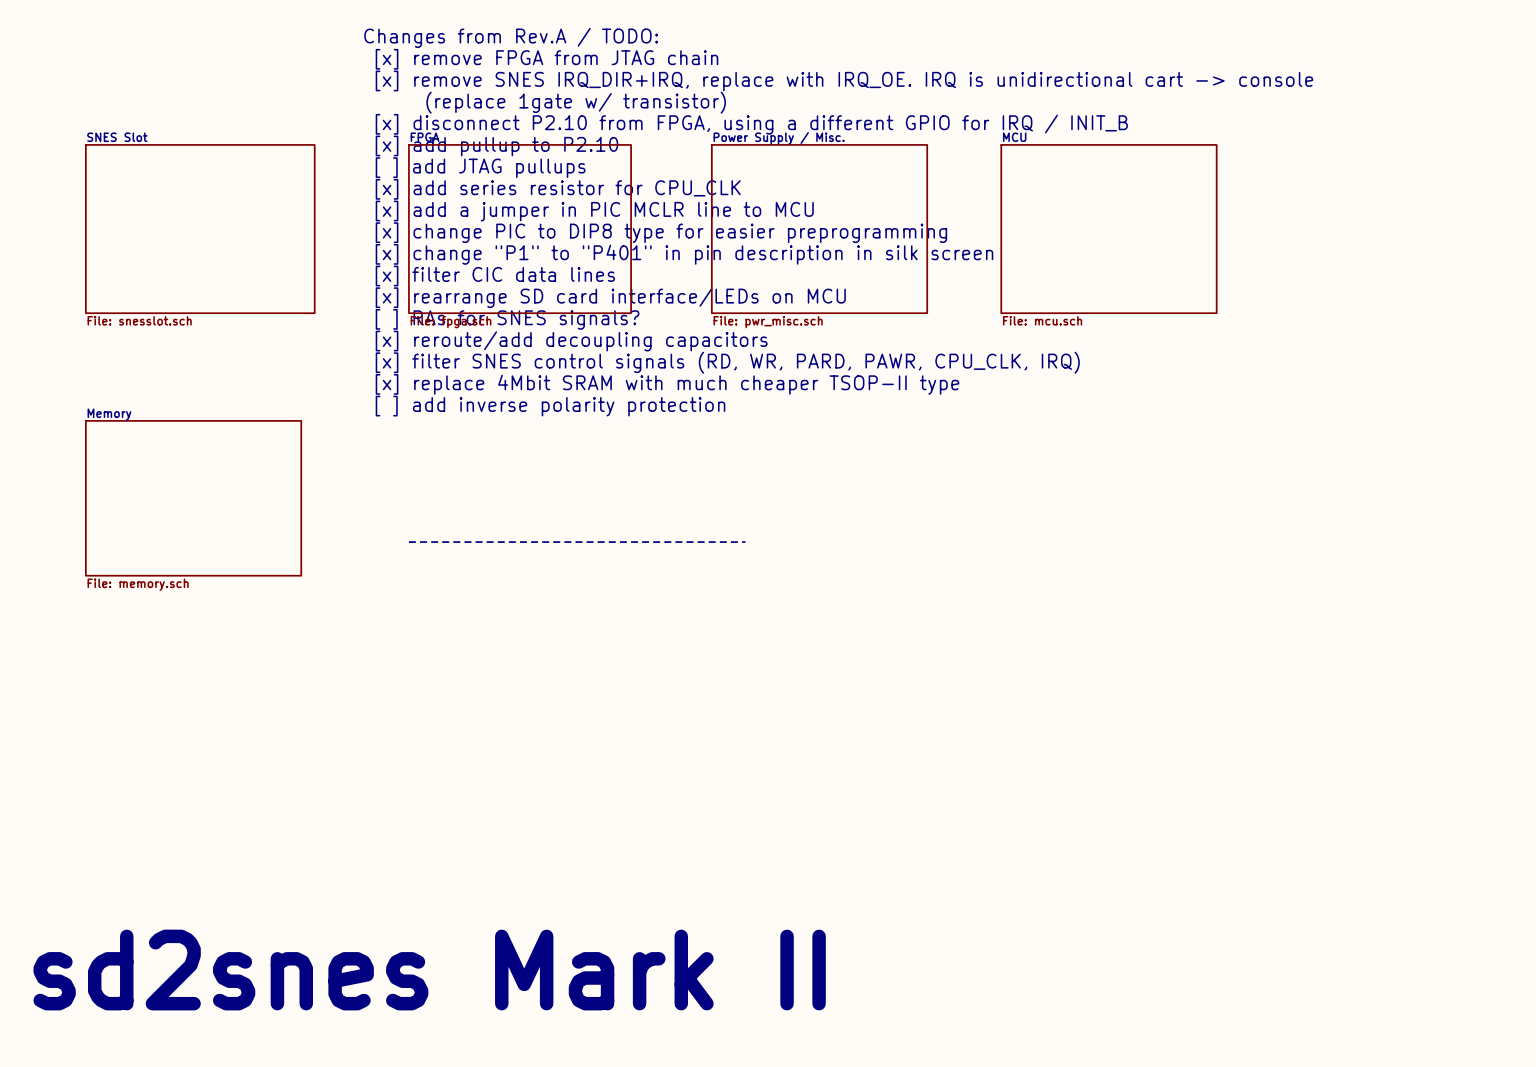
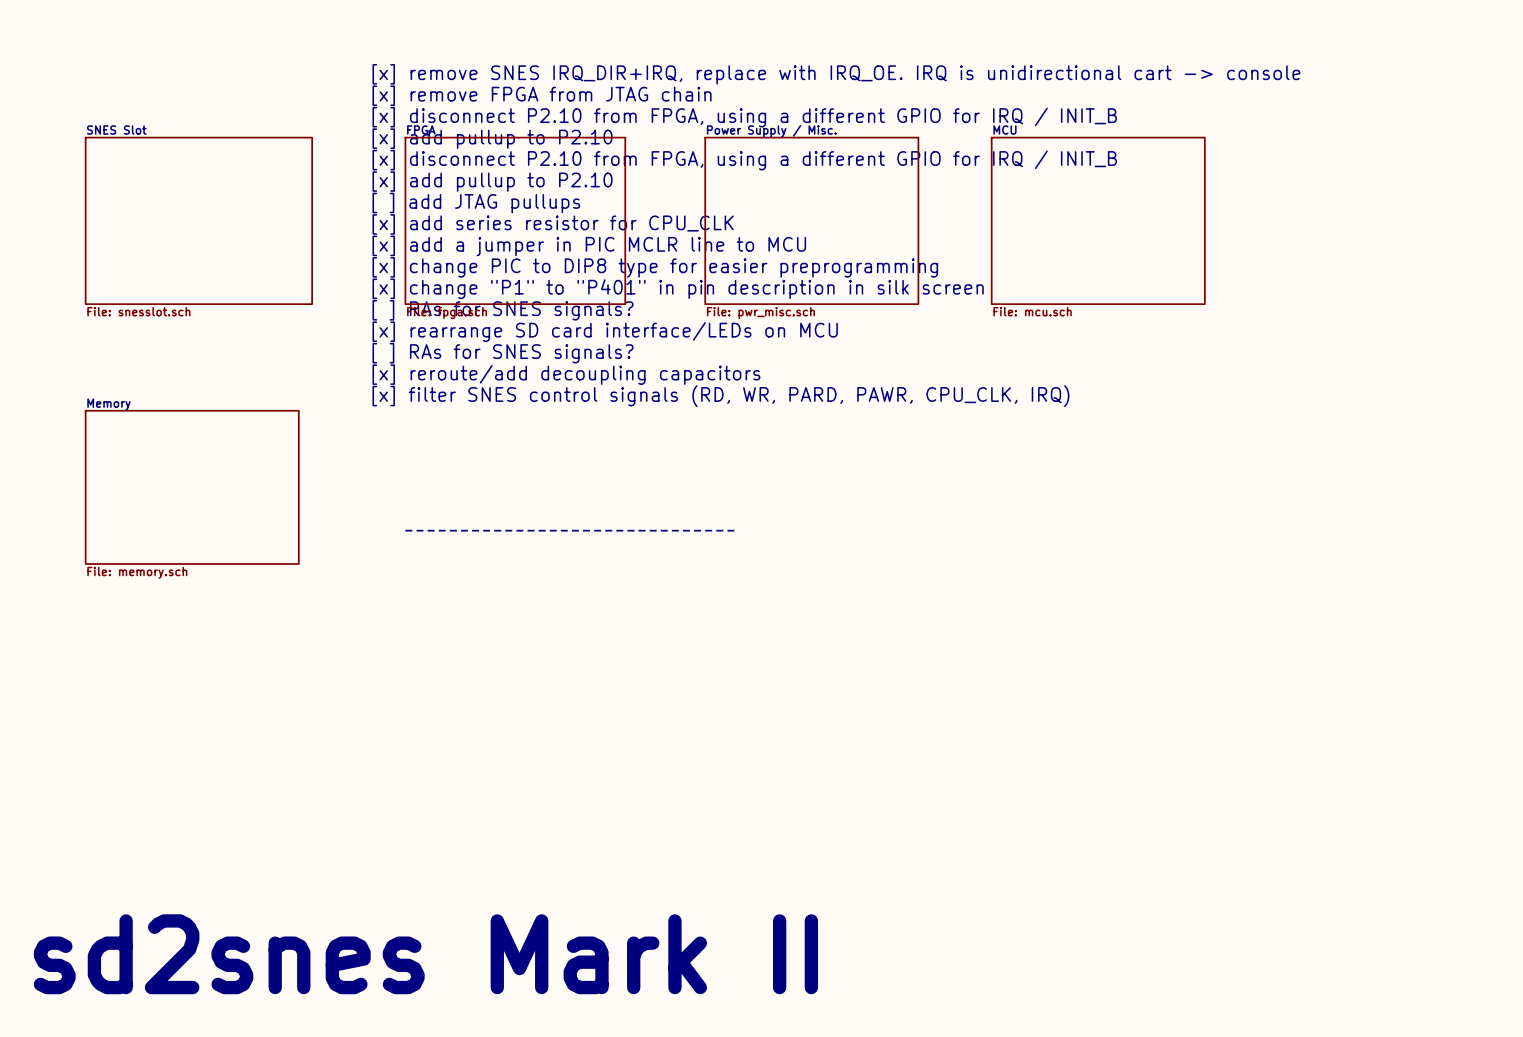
text: Changes from Rev.A / TODO: (511, 37) -> none
text: [x] remove FPGA from JTAG chain (546, 59) -> none
text: (replace 1gate w/ transistor) (576, 102) -> [x] remove FPGA from JTAG chain (542, 95)
text: [ ] add JTAG pullups (480, 167) -> [x] disconnect P2.10 from FPGA, using a different GPIO for IRQ / INIT_B (744, 160)
text: [x] add series resistor for CPU_CLK (558, 189) -> [x] add pullup to P2.10 (492, 181)
text: [x] add a jumper in PIC MCLR line to MCU (594, 211) -> [ ] add JTAG pullups (476, 203)
text: [x] change PIC to DIP8 type for easier preprogramming (661, 232) -> [x] add series resistor for CPU_CLK (553, 224)
text: [x] change "P1" to "P401" in pin description in silk screen (684, 254) -> [x] add a jumper in PIC MCLR line to MCU (589, 245)
text: [x] filter CIC data lines (495, 276) -> [x] change PIC to DIP8 type for easier preprogramming (655, 267)
text: [x] rearrange SD card interface/LEDs on MCU (610, 297) -> [x] change "P1" to "P401" in pin description in silk screen (678, 288)
text: [x] reroute/add decoupling capacitors (571, 341) -> [x] rearrange SD card interface/LEDs on MCU (605, 331)
text: [x] filter SNES control signals (RD, WR, PARD, PAWR, CPU_CLK, IRQ) (727, 362) -> [ ] RAs for SNES signals? (503, 353)
text: [x] replace 4Mbit SRAM with much cheaper TSOP-II type (667, 384) -> [x] reroute/add decoupling capacitors (566, 374)
text: [ ] add inverse polarity protection (550, 406) -> [x] filter SNES control signals (RD, WR, PARD, PAWR, CPU_CLK, IRQ) (720, 396)

